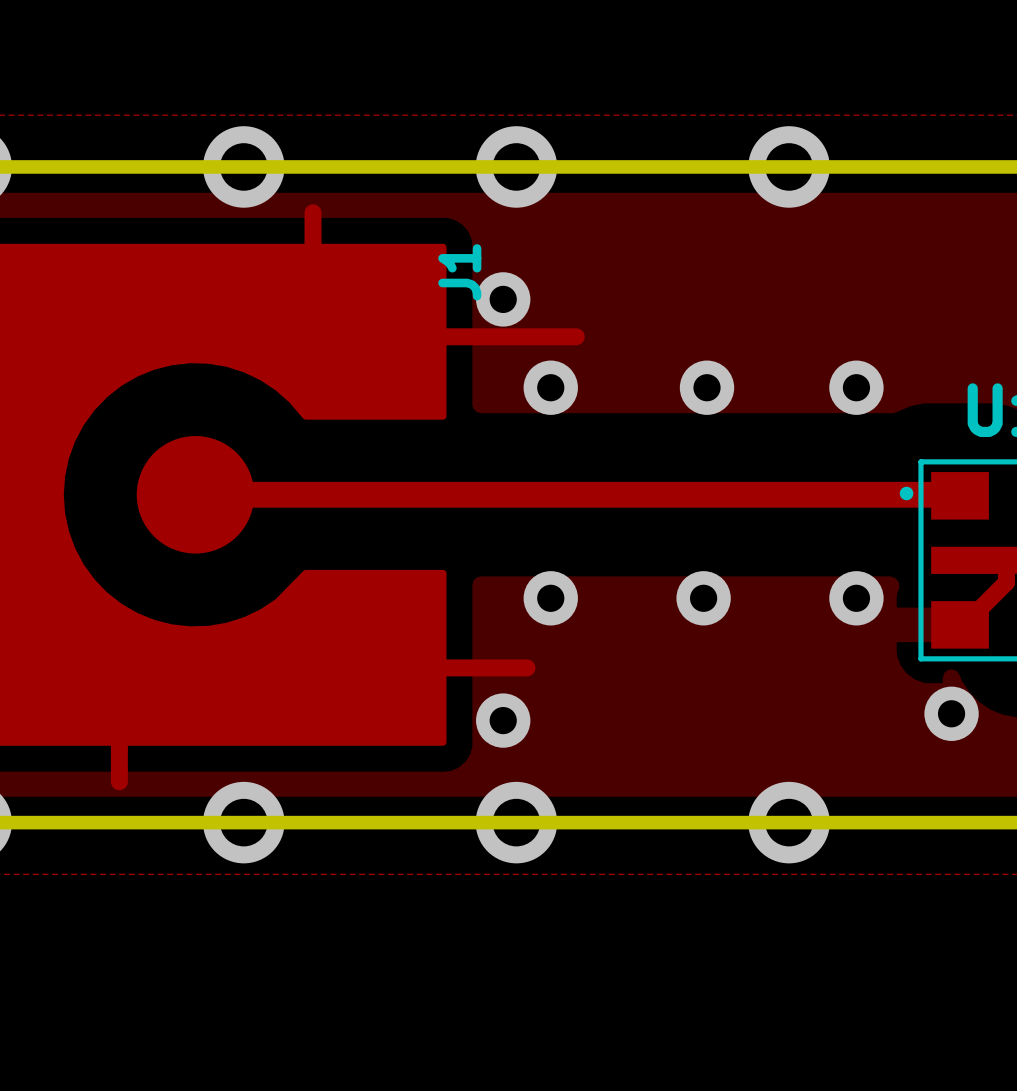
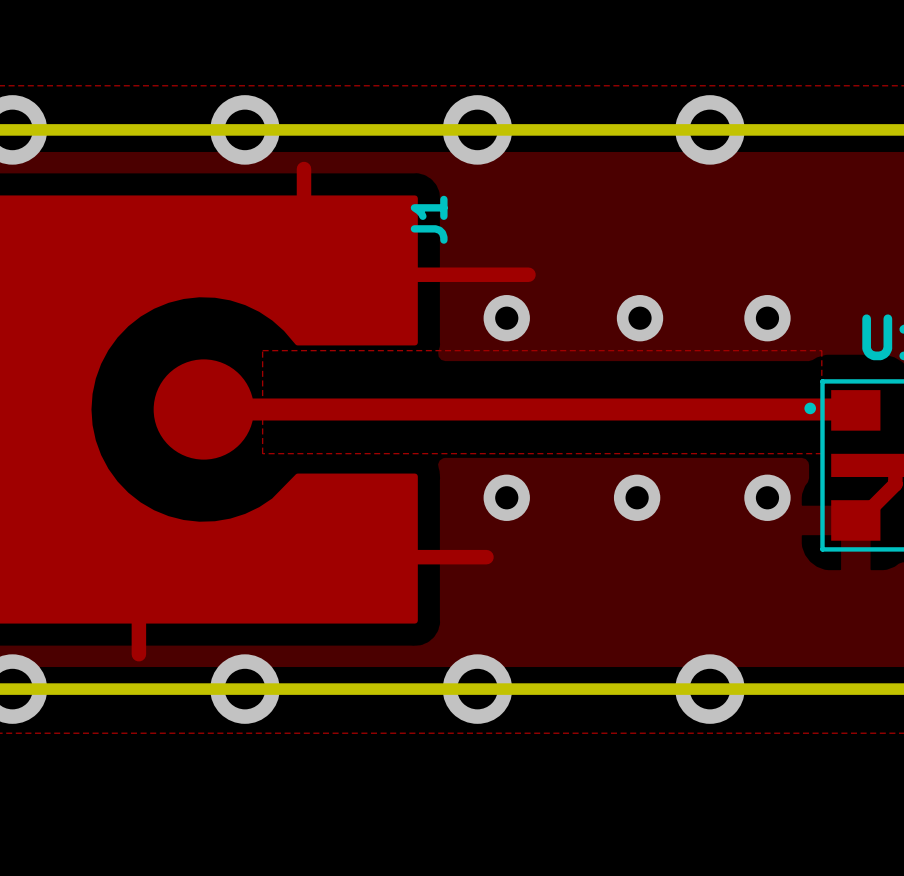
via: (503, 299) -> none
zone outline: none -> (262, 350) (262, 453) (821, 453) (821, 350) (262, 350)
via: (951, 713) -> none
via: (503, 720) -> none

